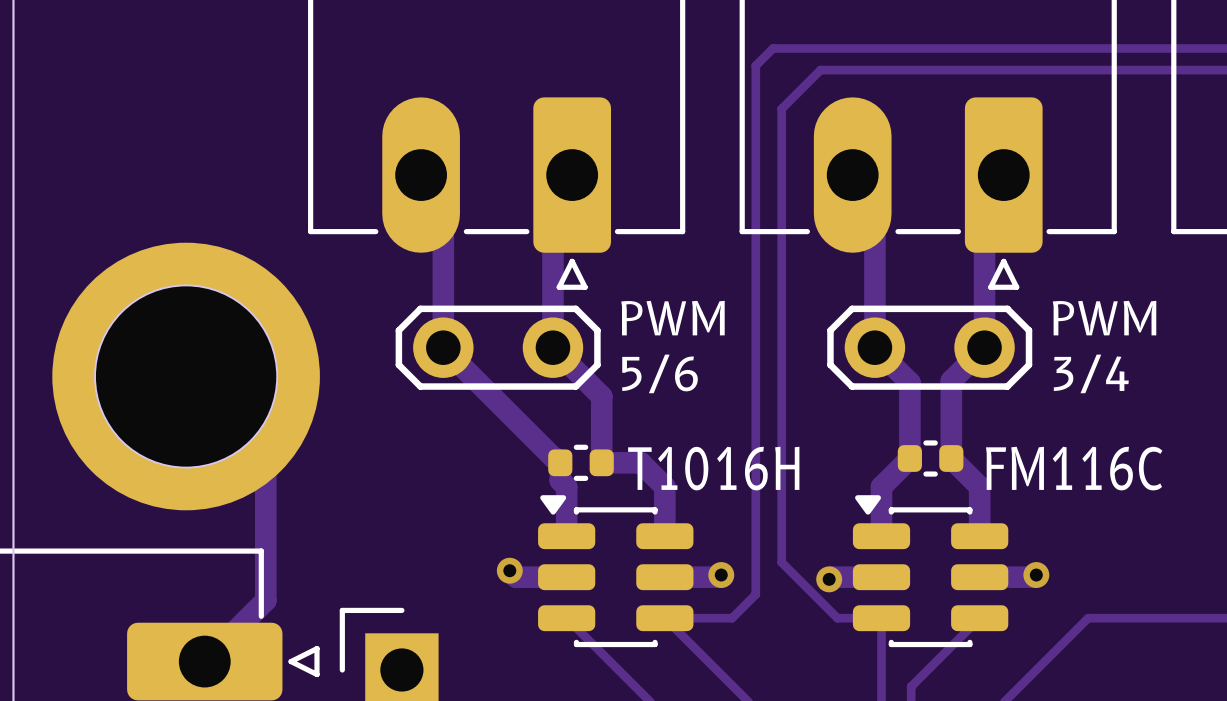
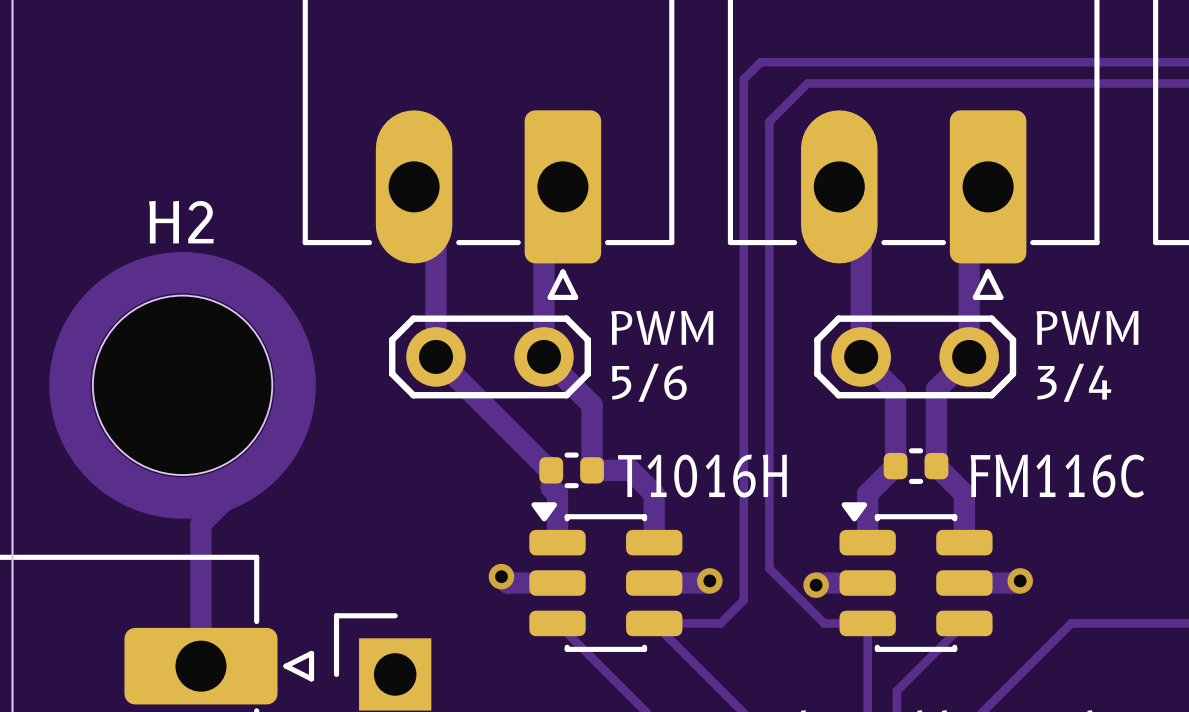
part: (186, 376) -> none
H2: none -> (182, 385)
track: (265, 456) (265, 600) (204, 661) -> (261, 463) (200, 523) (200, 666)

